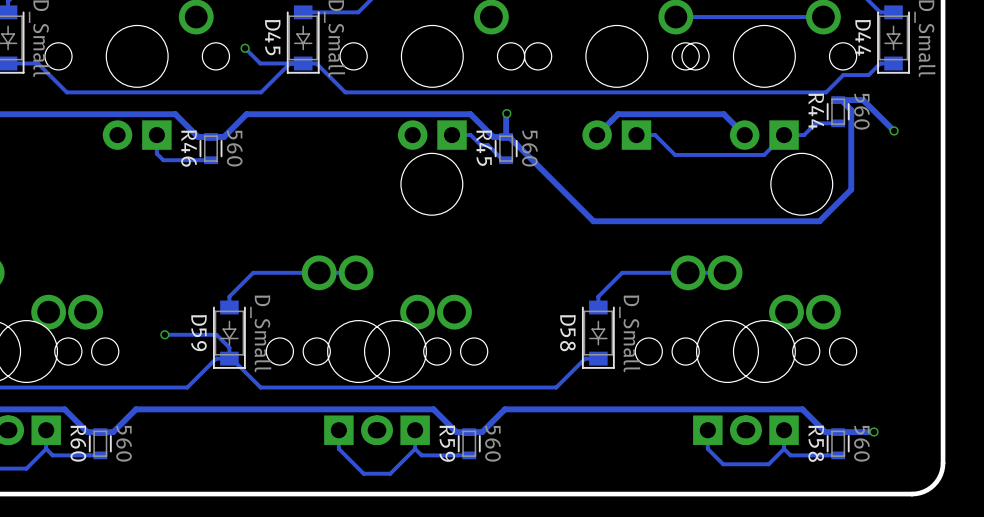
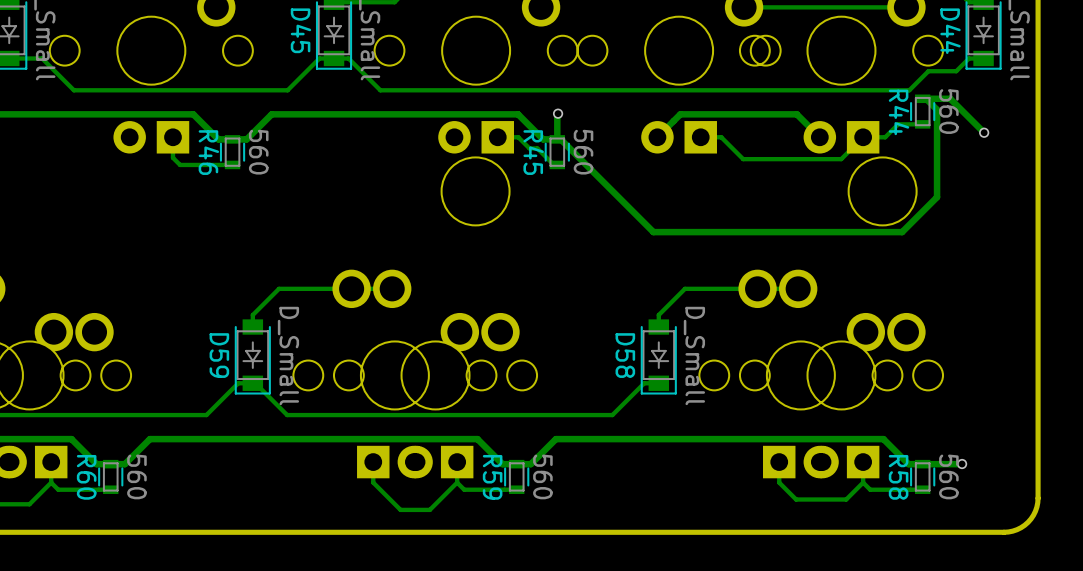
track: (245, 48) (260, 63) (289, 63) -> none
via: (245, 48) -> none
track: (164, 334) (216, 334) (229, 347) (229, 358) -> none
via: (164, 334) -> none

